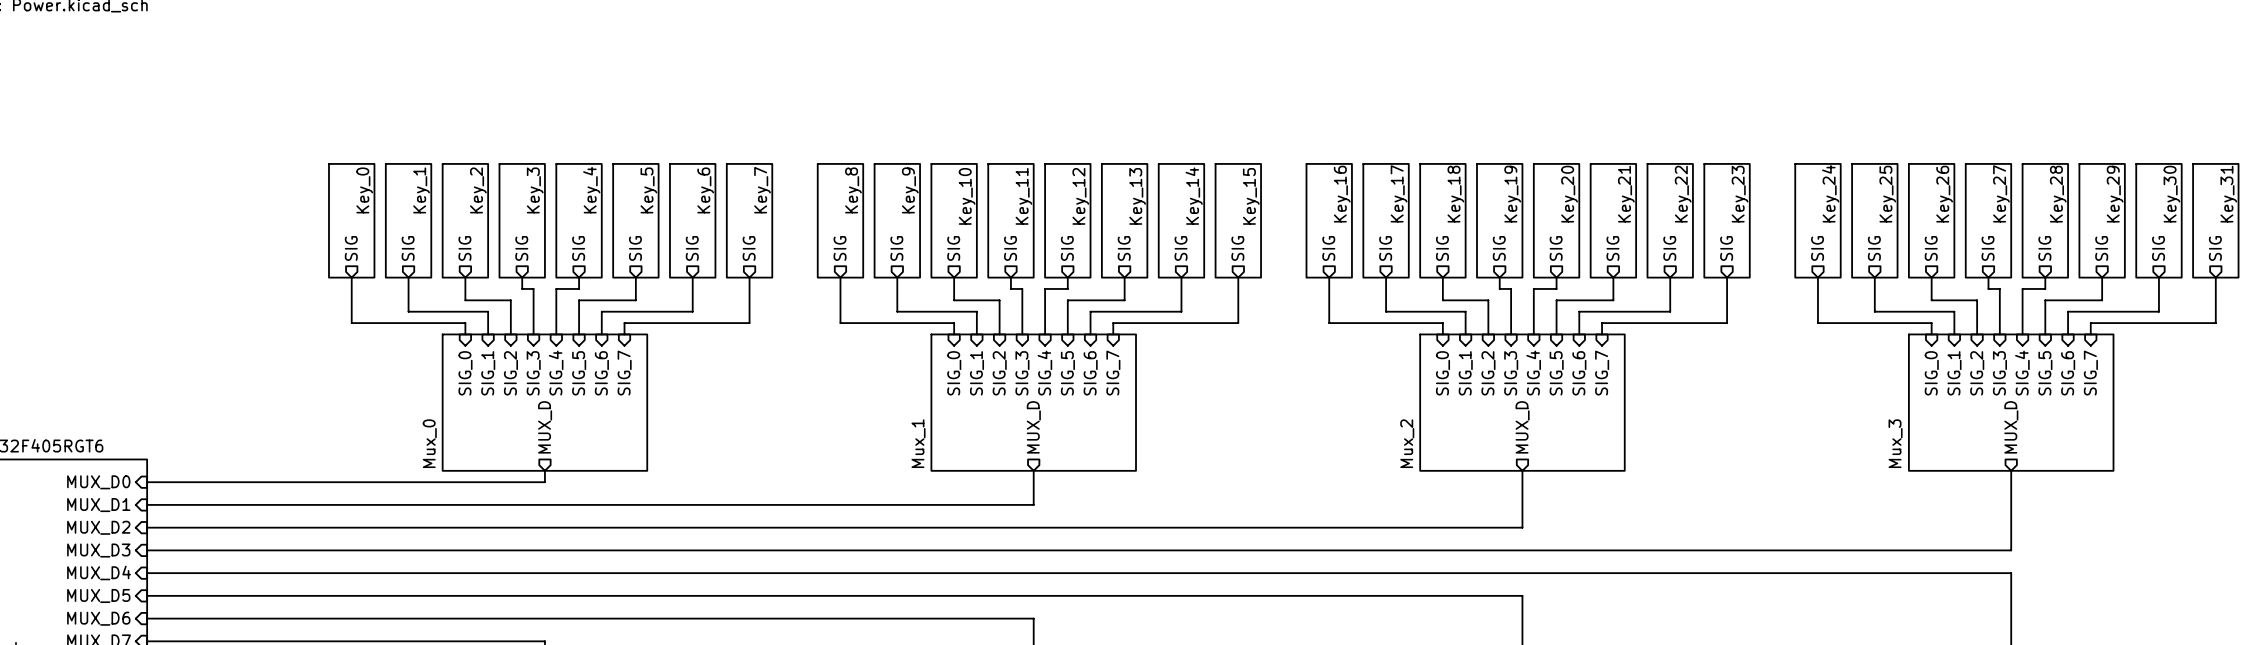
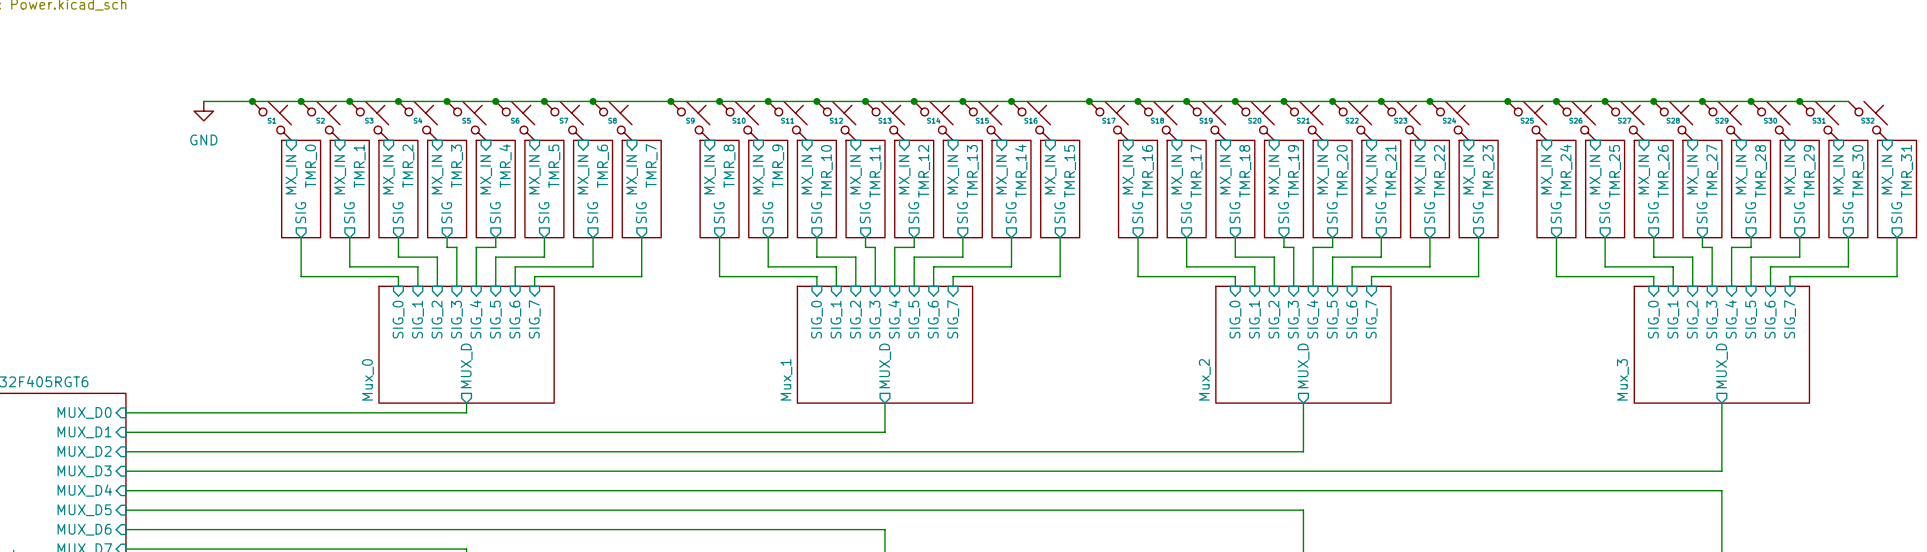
wire: none -> (203, 101) (1848, 101)
junction: none -> (252, 101)
junction: none -> (301, 101)
junction: none -> (349, 101)
junction: none -> (398, 101)
junction: none -> (447, 101)
junction: none -> (495, 101)
junction: none -> (544, 101)
junction: none -> (593, 101)
junction: none -> (670, 101)
junction: none -> (719, 101)
junction: none -> (768, 101)
junction: none -> (816, 101)
junction: none -> (865, 101)
junction: none -> (914, 101)
junction: none -> (962, 101)
junction: none -> (1011, 101)
junction: none -> (1089, 101)
junction: none -> (1138, 101)
junction: none -> (1186, 101)
junction: none -> (1235, 101)
junction: none -> (1283, 101)
junction: none -> (1332, 101)
junction: none -> (1381, 101)
junction: none -> (1429, 101)
junction: none -> (1507, 101)
junction: none -> (1556, 101)
junction: none -> (1605, 101)
junction: none -> (1653, 101)
junction: none -> (1702, 101)
junction: none -> (1751, 101)
junction: none -> (1799, 101)
power symbol: none -> GND (203, 111)
part: none -> (271, 120)
part: none -> (320, 120)
part: none -> (369, 120)
part: none -> (417, 120)
part: none -> (466, 120)
part: none -> (515, 120)
part: none -> (563, 120)
part: none -> (612, 120)
part: none -> (690, 120)
part: none -> (739, 120)
part: none -> (787, 120)
part: none -> (836, 120)
part: none -> (885, 120)
part: none -> (933, 120)
part: none -> (982, 120)
part: none -> (1030, 120)
part: none -> (1108, 120)
part: none -> (1157, 120)
part: none -> (1206, 120)
part: none -> (1254, 120)
part: none -> (1303, 120)
part: none -> (1352, 120)
part: none -> (1400, 120)
part: none -> (1449, 120)
part: none -> (1527, 120)
part: none -> (1575, 120)
part: none -> (1624, 120)
part: none -> (1673, 120)
part: none -> (1721, 120)
part: none -> (1770, 120)
part: none -> (1819, 120)
part: none -> (1867, 120)
sheet Key_0 name: Key_0 (364, 190) -> TMR_0 (311, 166)
sheet Key_1 name: Key_1 (421, 190) -> TMR_1 (359, 166)
sheet Key_2 name: Key_2 (478, 190) -> TMR_2 (408, 166)
sheet Key_3 name: Key_3 (535, 190) -> TMR_3 (457, 166)
sheet Key_4 name: Key_4 (591, 190) -> TMR_4 (505, 166)
sheet Key_5 name: Key_5 (648, 190) -> TMR_5 (554, 166)
sheet Key_6 name: Key_6 (705, 190) -> TMR_6 (603, 166)
sheet Key_7 name: Key_7 (762, 190) -> TMR_7 (651, 166)
sheet Key_8 name: Key_8 (853, 190) -> TMR_8 (729, 166)
sheet Key_9 name: Key_9 (910, 190) -> TMR_9 (778, 166)
sheet Key_17 name: Key_17 (1399, 193) -> TMR_17 (1196, 171)
sheet Key_24 name: Key_24 (1830, 193) -> TMR_24 (1566, 171)
sheet Key_27 name: Key_27 (2001, 193) -> TMR_27 (1712, 171)
sheet Key_16 name: Key_16 (1342, 194) -> TMR_16 (1147, 171)
sheet Key_18 name: Key_18 (1455, 194) -> TMR_18 (1245, 171)
sheet Key_19 name: Key_19 (1512, 194) -> TMR_19 (1293, 171)
sheet Key_20 name: Key_20 (1569, 194) -> TMR_20 (1342, 171)
sheet Key_21 name: Key_21 (1626, 194) -> TMR_21 (1391, 171)
sheet Key_22 name: Key_22 (1683, 194) -> TMR_22 (1439, 171)
sheet Key_23 name: Key_23 (1740, 194) -> TMR_23 (1488, 171)
sheet Key_25 name: Key_25 (1887, 194) -> TMR_25 (1615, 171)
sheet Key_26 name: Key_26 (1944, 194) -> TMR_26 (1663, 171)
sheet Key_28 name: Key_28 (2058, 194) -> TMR_28 (1761, 171)
sheet Key_29 name: Key_29 (2115, 194) -> TMR_29 (1809, 171)
sheet Key_30 name: Key_30 (2171, 194) -> TMR_30 (1858, 171)
sheet Key_31 name: Key_31 (2228, 194) -> TMR_31 (1907, 171)
sheet Key_10 name: Key_10 (967, 196) -> TMR_10 (826, 171)
sheet Key_11 name: Key_11 (1023, 196) -> TMR_11 (875, 171)
sheet Key_12 name: Key_12 (1080, 196) -> TMR_12 (924, 171)
sheet Key_13 name: Key_13 (1137, 196) -> TMR_13 (972, 171)
sheet Key_14 name: Key_14 (1194, 196) -> TMR_14 (1021, 171)
sheet Key_15 name: Key_15 (1251, 196) -> TMR_15 (1070, 171)
sheet pin: none -> MX_IN (291, 174)
sheet pin: none -> MX_IN (340, 174)
sheet pin: none -> MX_IN (388, 174)
sheet pin: none -> MX_IN (437, 174)
sheet pin: none -> MX_IN (486, 174)
sheet pin: none -> MX_IN (534, 174)
sheet pin: none -> MX_IN (583, 174)
sheet pin: none -> MX_IN (632, 174)
sheet pin: none -> MX_IN (709, 174)
sheet pin: none -> MX_IN (758, 174)
sheet pin: none -> MX_IN (807, 174)
sheet pin: none -> MX_IN (855, 174)
sheet pin: none -> MX_IN (904, 174)
sheet pin: none -> MX_IN (953, 174)
sheet pin: none -> MX_IN (1001, 174)
sheet pin: none -> MX_IN (1050, 174)
sheet pin: none -> MX_IN (1128, 174)
sheet pin: none -> MX_IN (1177, 174)
sheet pin: none -> MX_IN (1225, 174)
sheet pin: none -> MX_IN (1274, 174)
sheet pin: none -> MX_IN (1323, 174)
sheet pin: none -> MX_IN (1371, 174)
sheet pin: none -> MX_IN (1420, 174)
sheet pin: none -> MX_IN (1468, 174)
sheet pin: none -> MX_IN (1546, 174)
sheet pin: none -> MX_IN (1595, 174)
sheet pin: none -> MX_IN (1644, 174)
sheet pin: none -> MX_IN (1692, 174)
sheet pin: none -> MX_IN (1741, 174)
sheet pin: none -> MX_IN (1790, 174)
sheet pin: none -> MX_IN (1838, 174)
sheet pin: none -> MX_IN (1887, 174)

